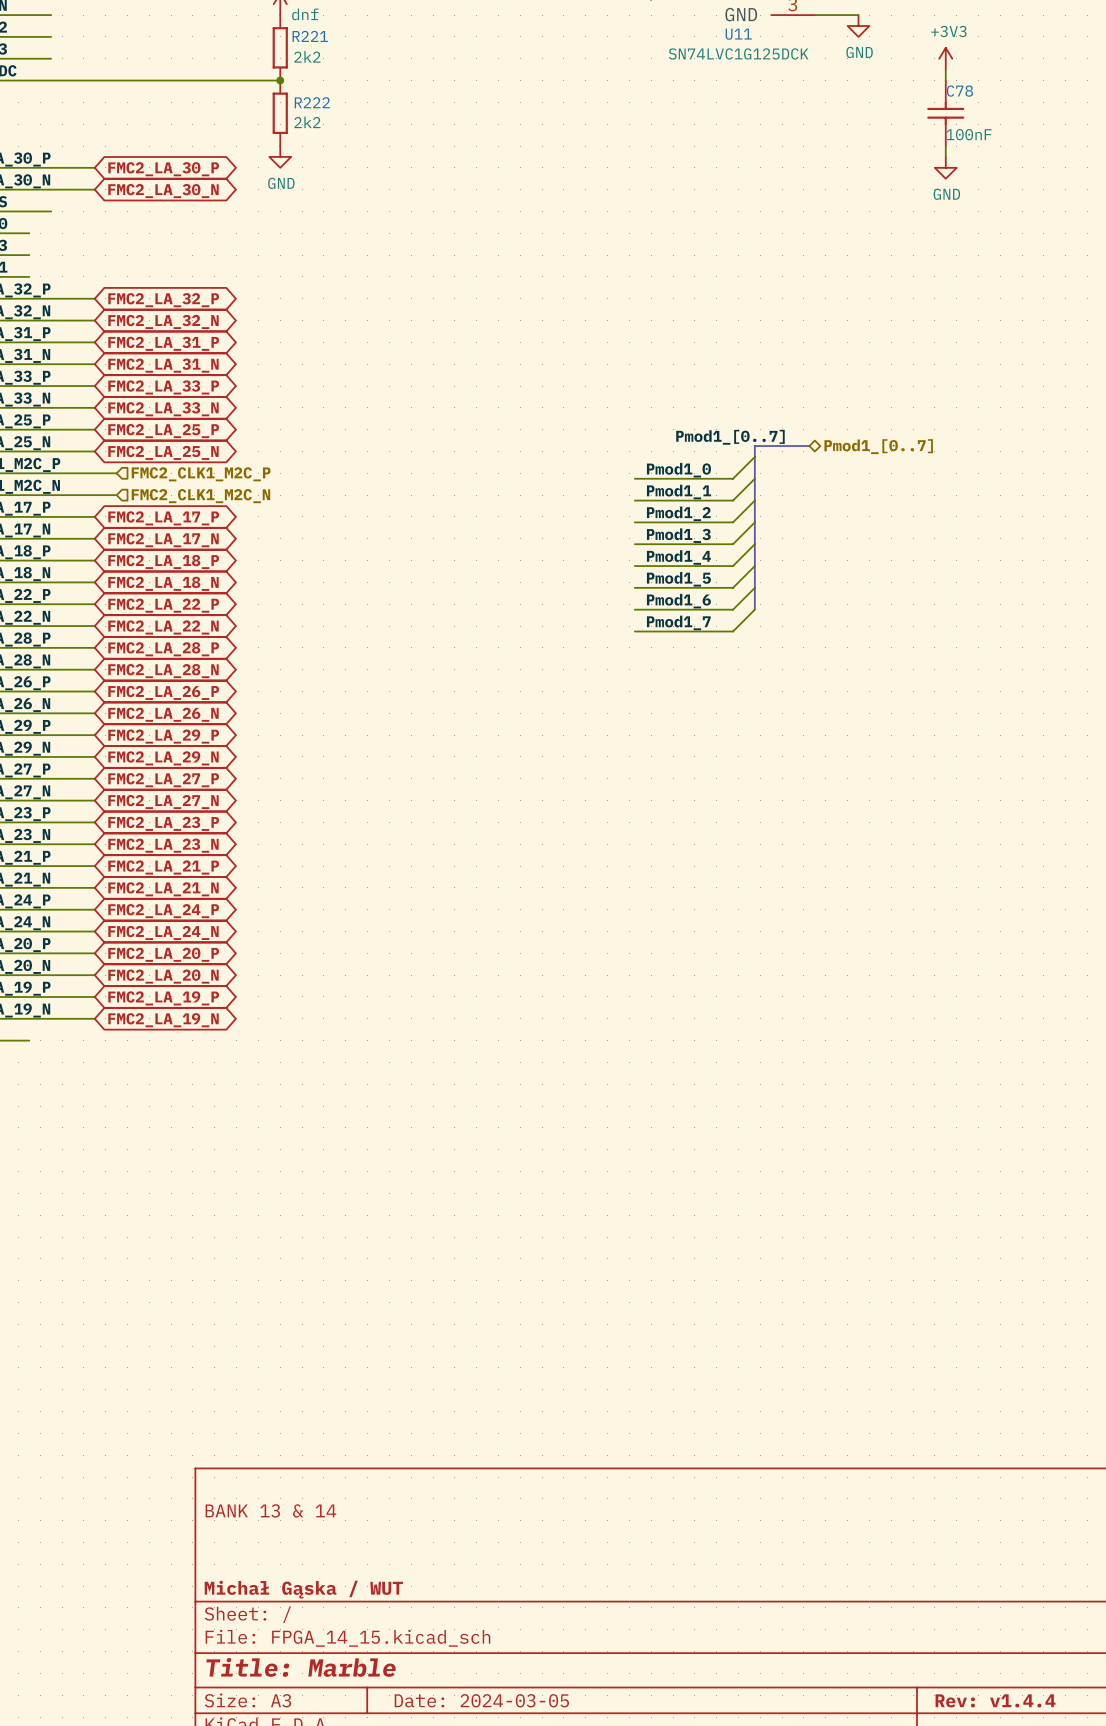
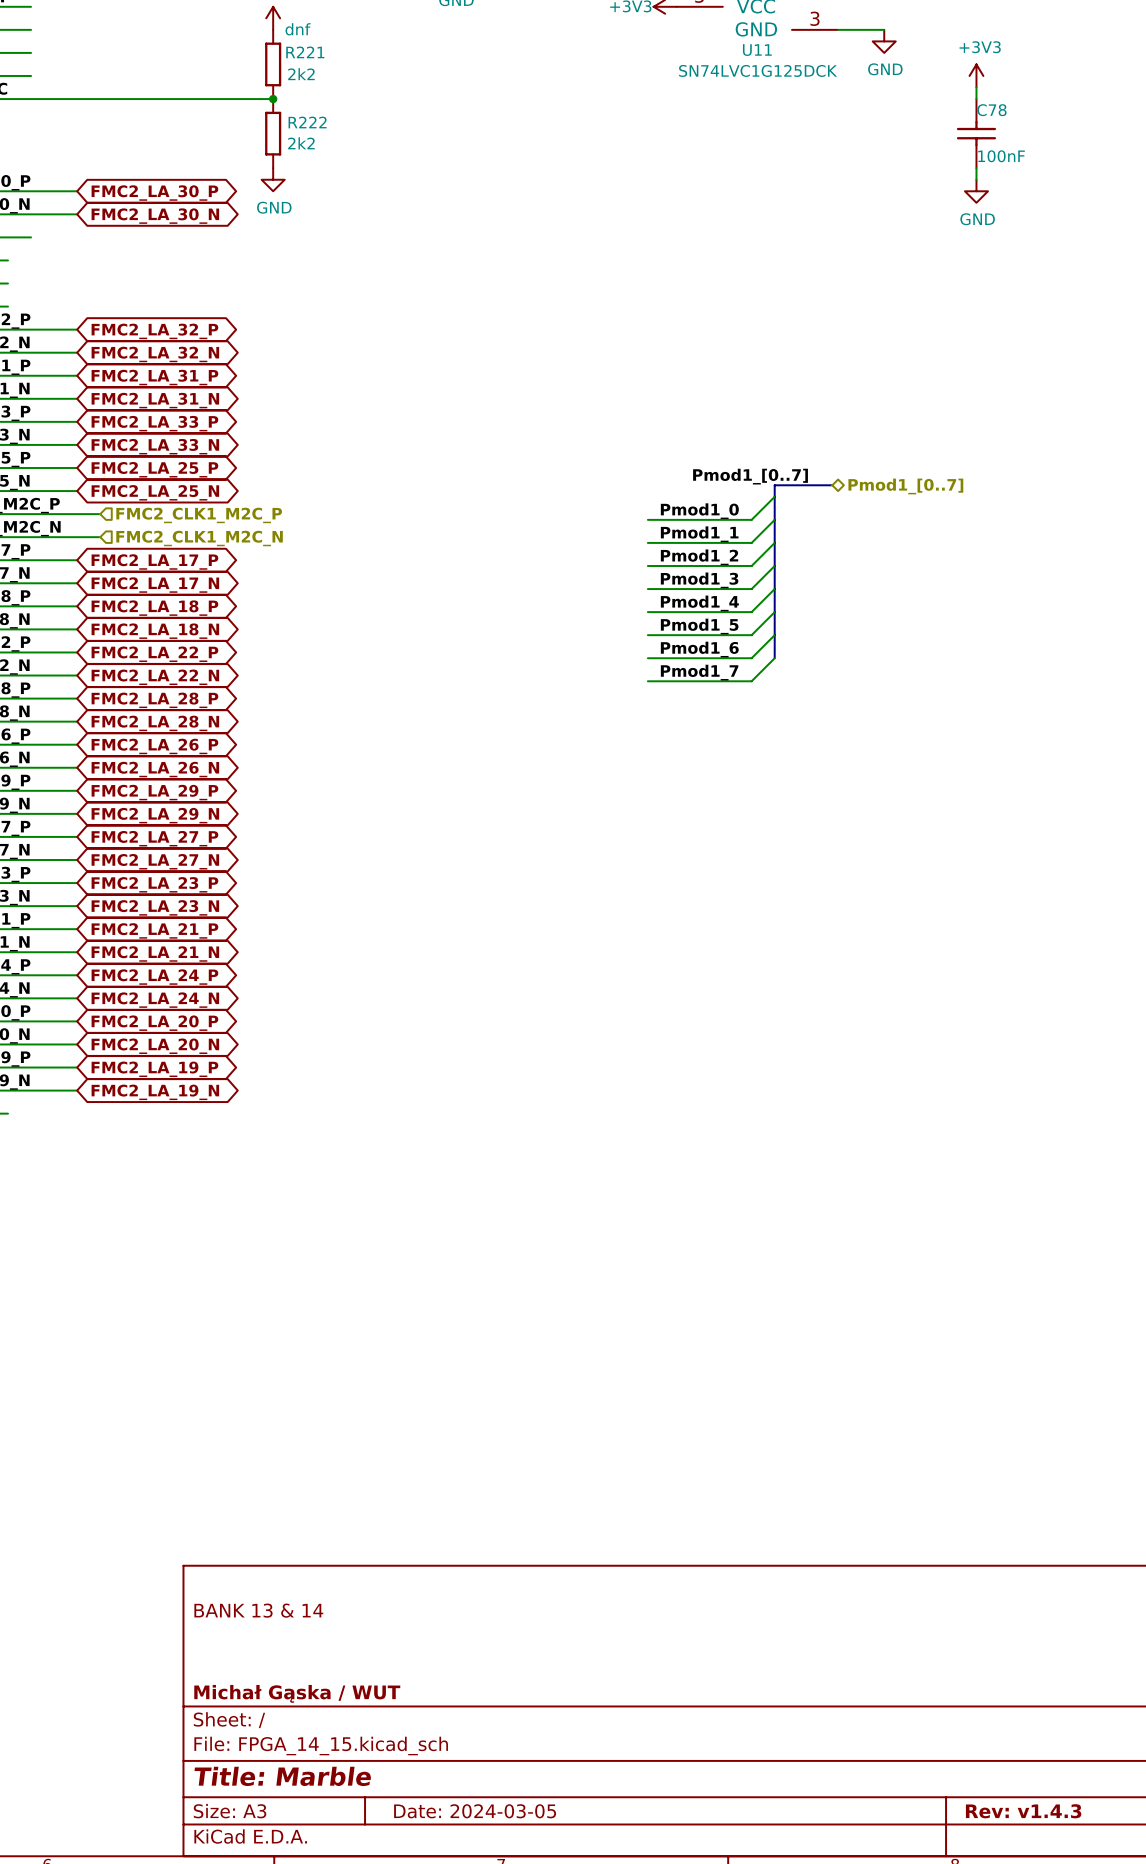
title block: Rev: v1.4.4 (995, 1700) -> Rev: v1.4.3 (1023, 1811)

